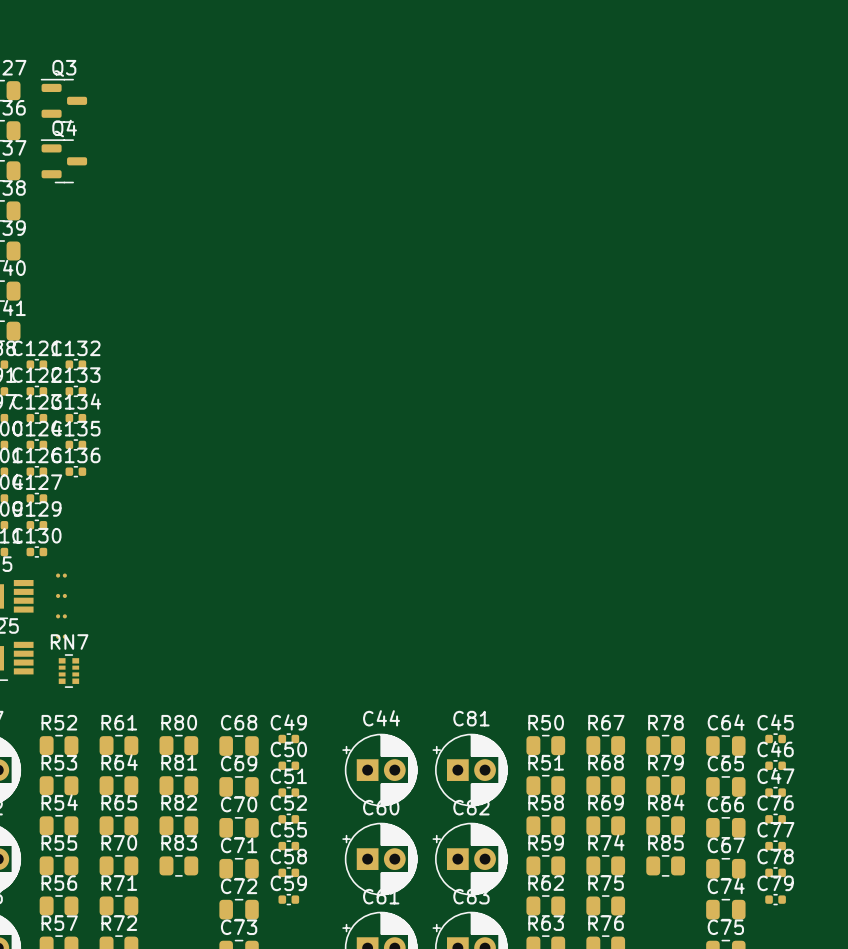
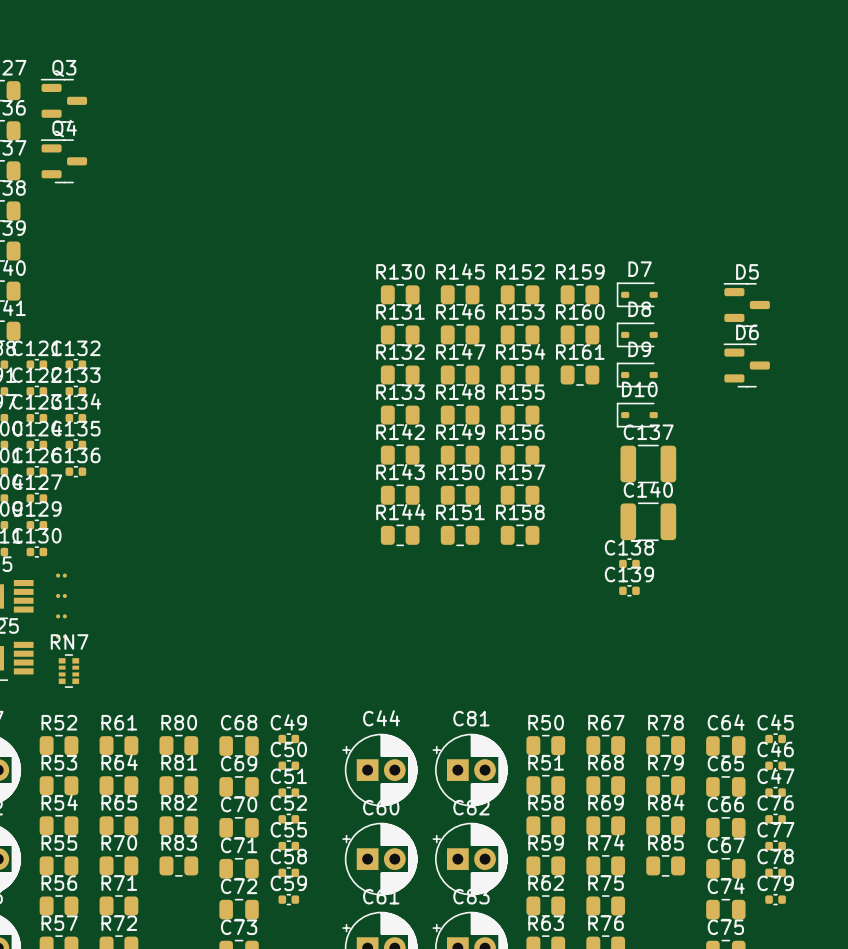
R130: none -> (400, 294)
R145: none -> (460, 294)
R152: none -> (520, 294)
R159: none -> (579, 294)
D7: none -> (637, 294)
D5: none -> (746, 305)
R131: none -> (400, 334)
R146: none -> (460, 334)
R153: none -> (520, 334)
R160: none -> (579, 334)
D8: none -> (637, 334)
D6: none -> (746, 365)
R132: none -> (400, 375)
R147: none -> (460, 375)
R154: none -> (520, 375)
R161: none -> (579, 375)
D9: none -> (637, 375)
R133: none -> (400, 415)
R148: none -> (460, 415)
R155: none -> (520, 415)
D10: none -> (637, 415)
R142: none -> (400, 455)
R149: none -> (460, 455)
R156: none -> (520, 455)
C137: none -> (648, 464)
R143: none -> (400, 495)
R150: none -> (460, 495)
R157: none -> (520, 495)
C140: none -> (648, 521)
R144: none -> (400, 535)
R151: none -> (460, 535)
R158: none -> (520, 535)
C138: none -> (629, 564)
C139: none -> (629, 590)

